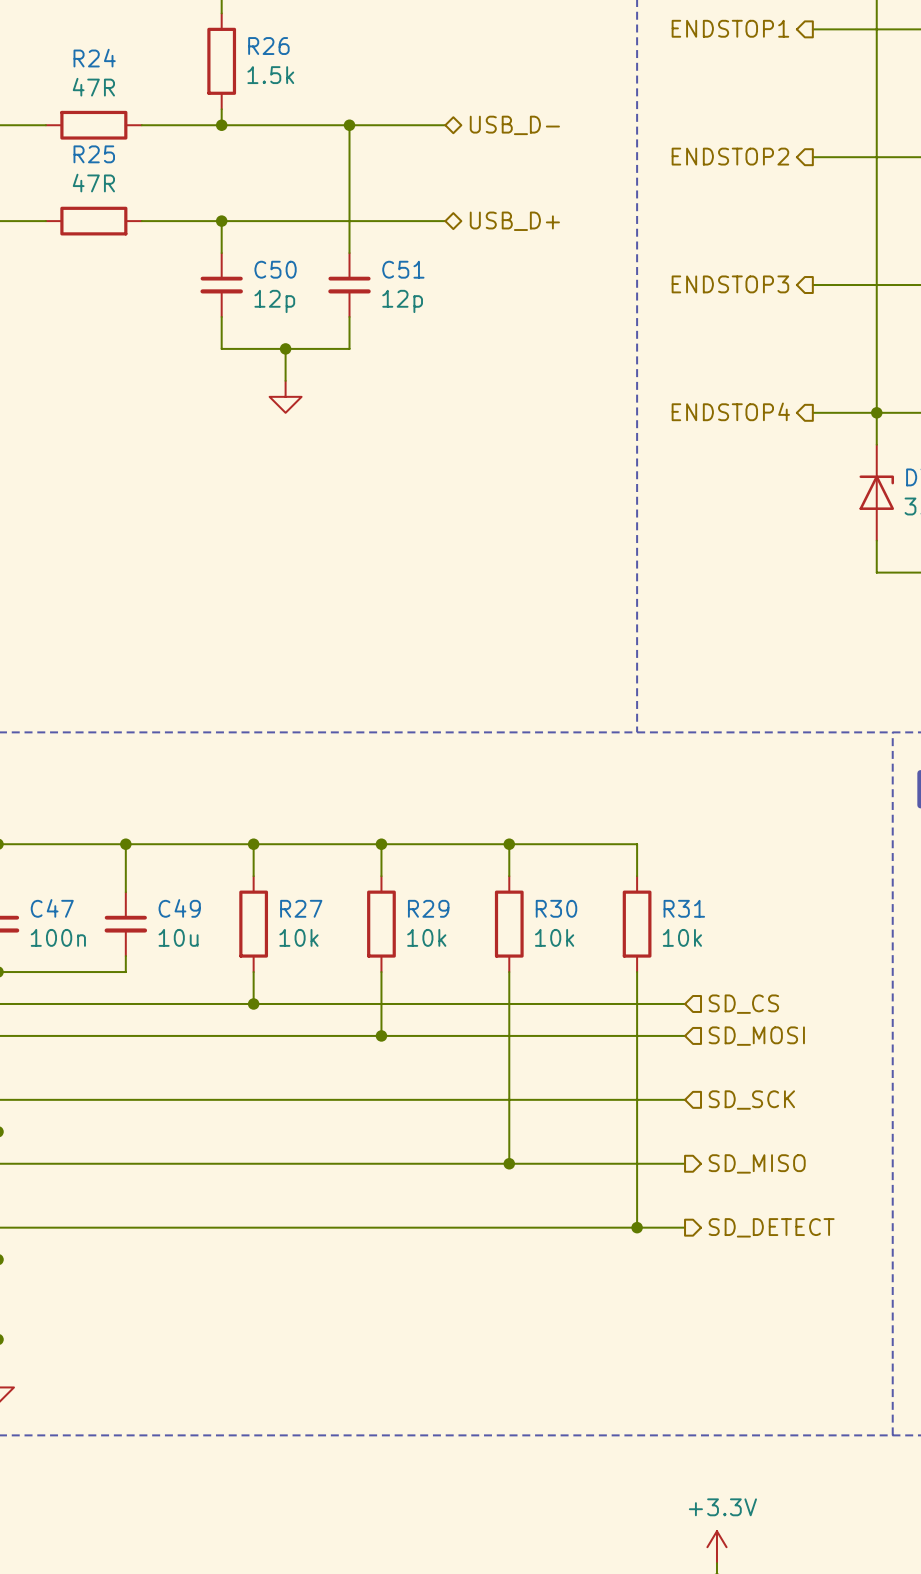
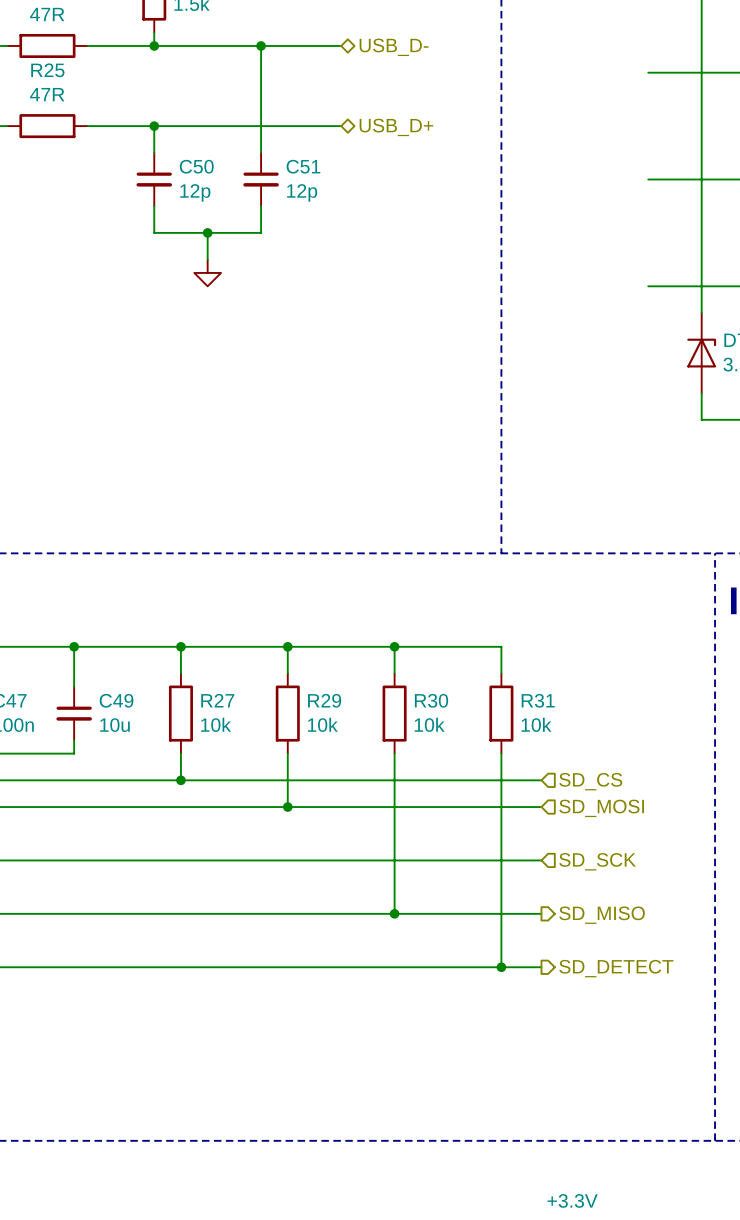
hierarchical label: ENDSTOP2 (730, 156) -> none
hierarchical label: ENDSTOP3 (730, 284) -> none
hierarchical label: ENDSTOP4 (730, 411) -> none
junction: (876, 412) -> none

